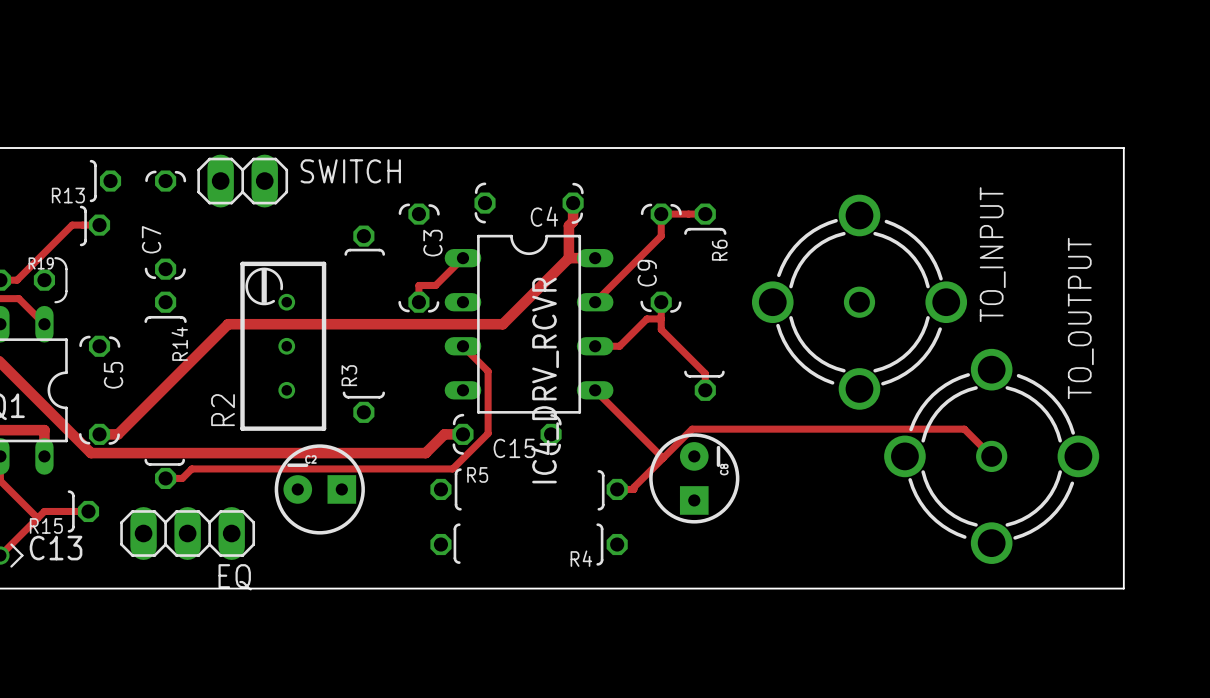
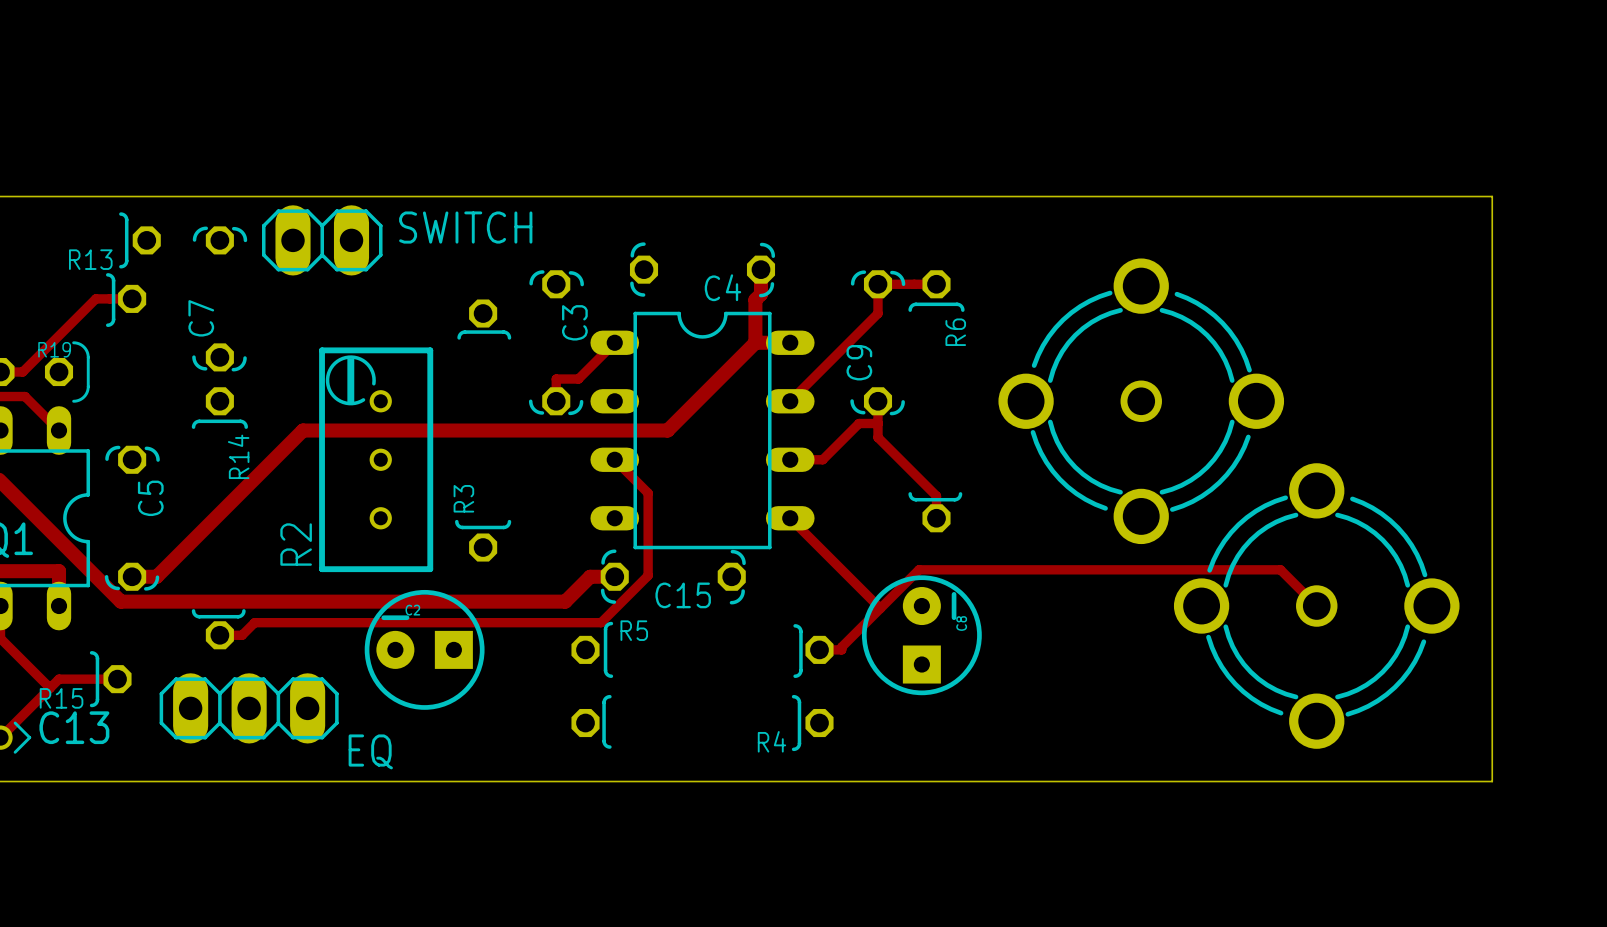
TO_INPUT name: TO_INPUT (992, 254) -> none
TO_OUTPUT name: TO_OUTPUT (1080, 318) -> none
IC4_DRV_RCVR name: IC4_DRV_RCVR (545, 380) -> none
EQ name position: EQ (235, 577) -> EQ (370, 751)

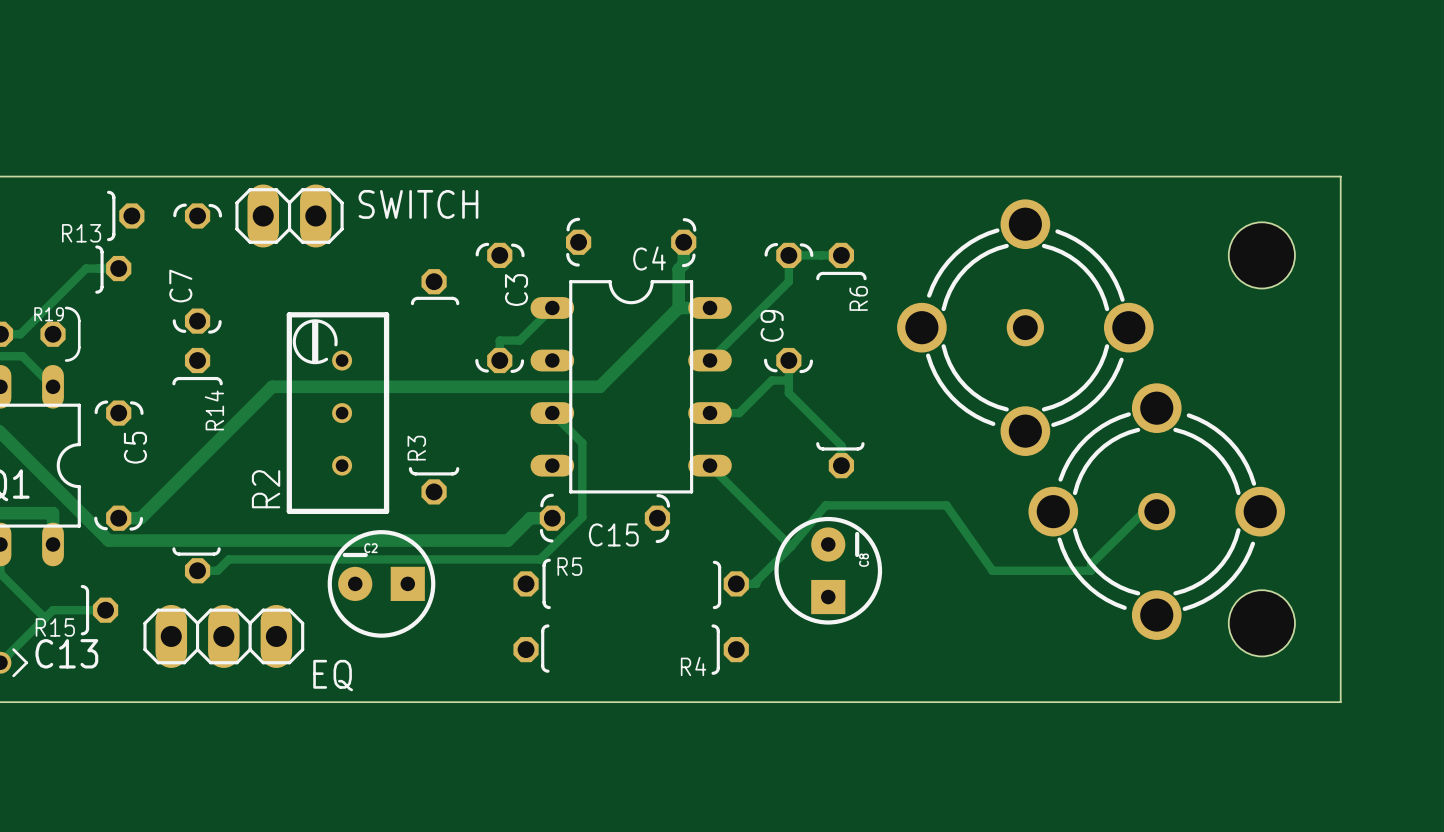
hole: none -> (1261, 255)
part position: (1141, 401) -> (1025, 327)
track: (1316, 606) (1280, 569) (919, 569) (880, 608) -> (1156, 511) (1150, 505) (1091, 564) (1091, 570) (992, 570) (946, 505) (825, 505) (791, 546)
part position: (1316, 606) -> (1156, 511)
hole: none -> (1261, 623)

